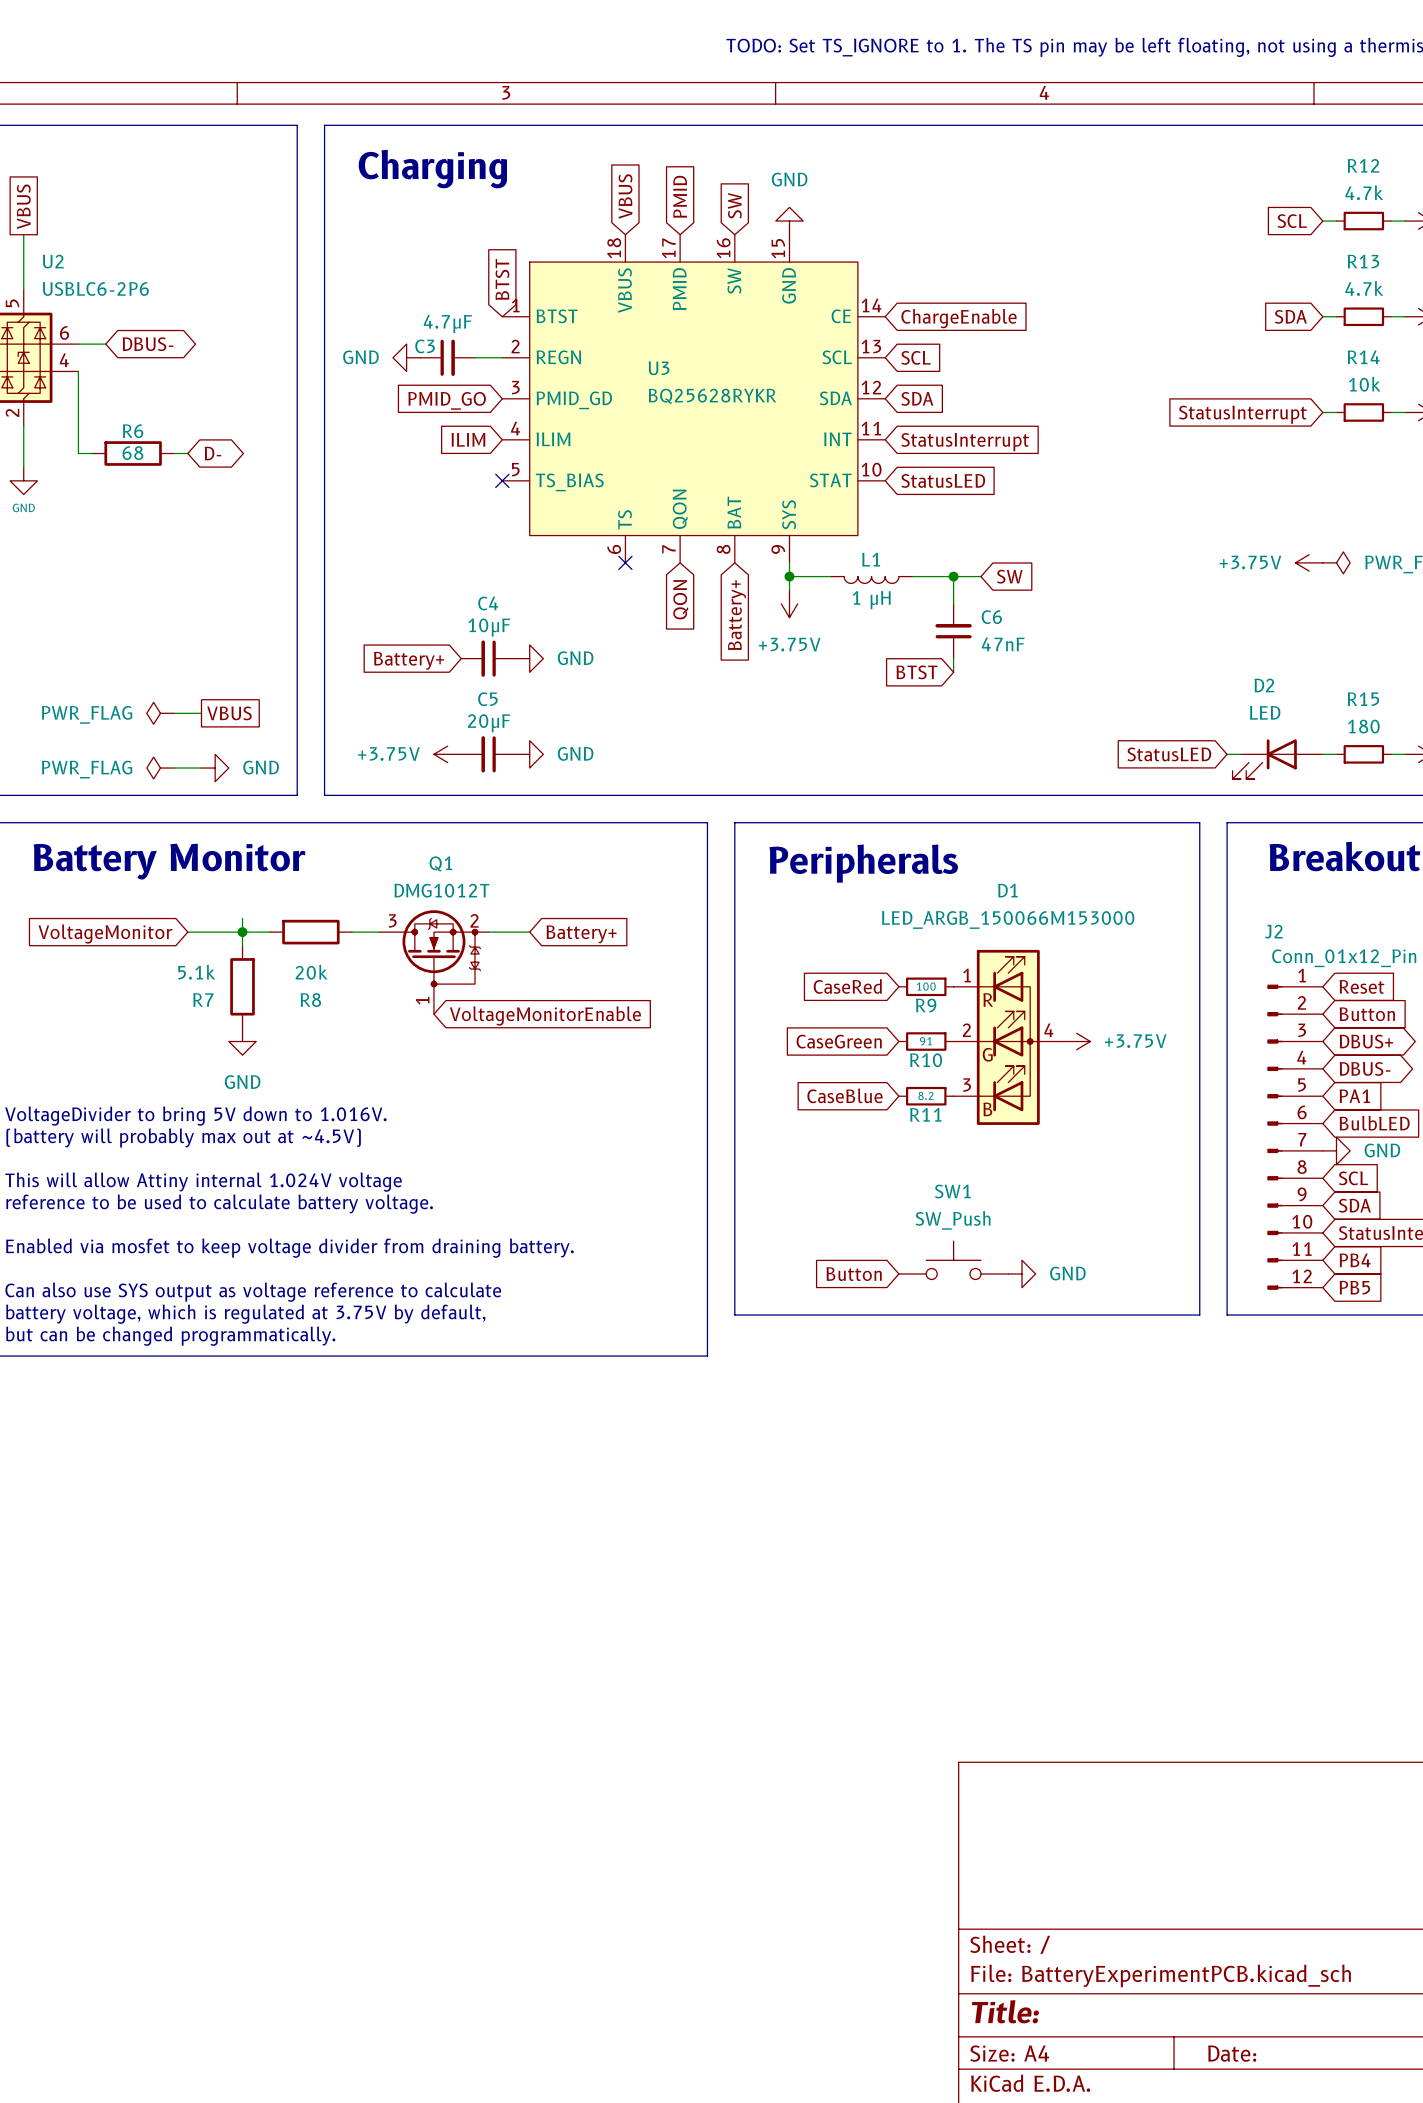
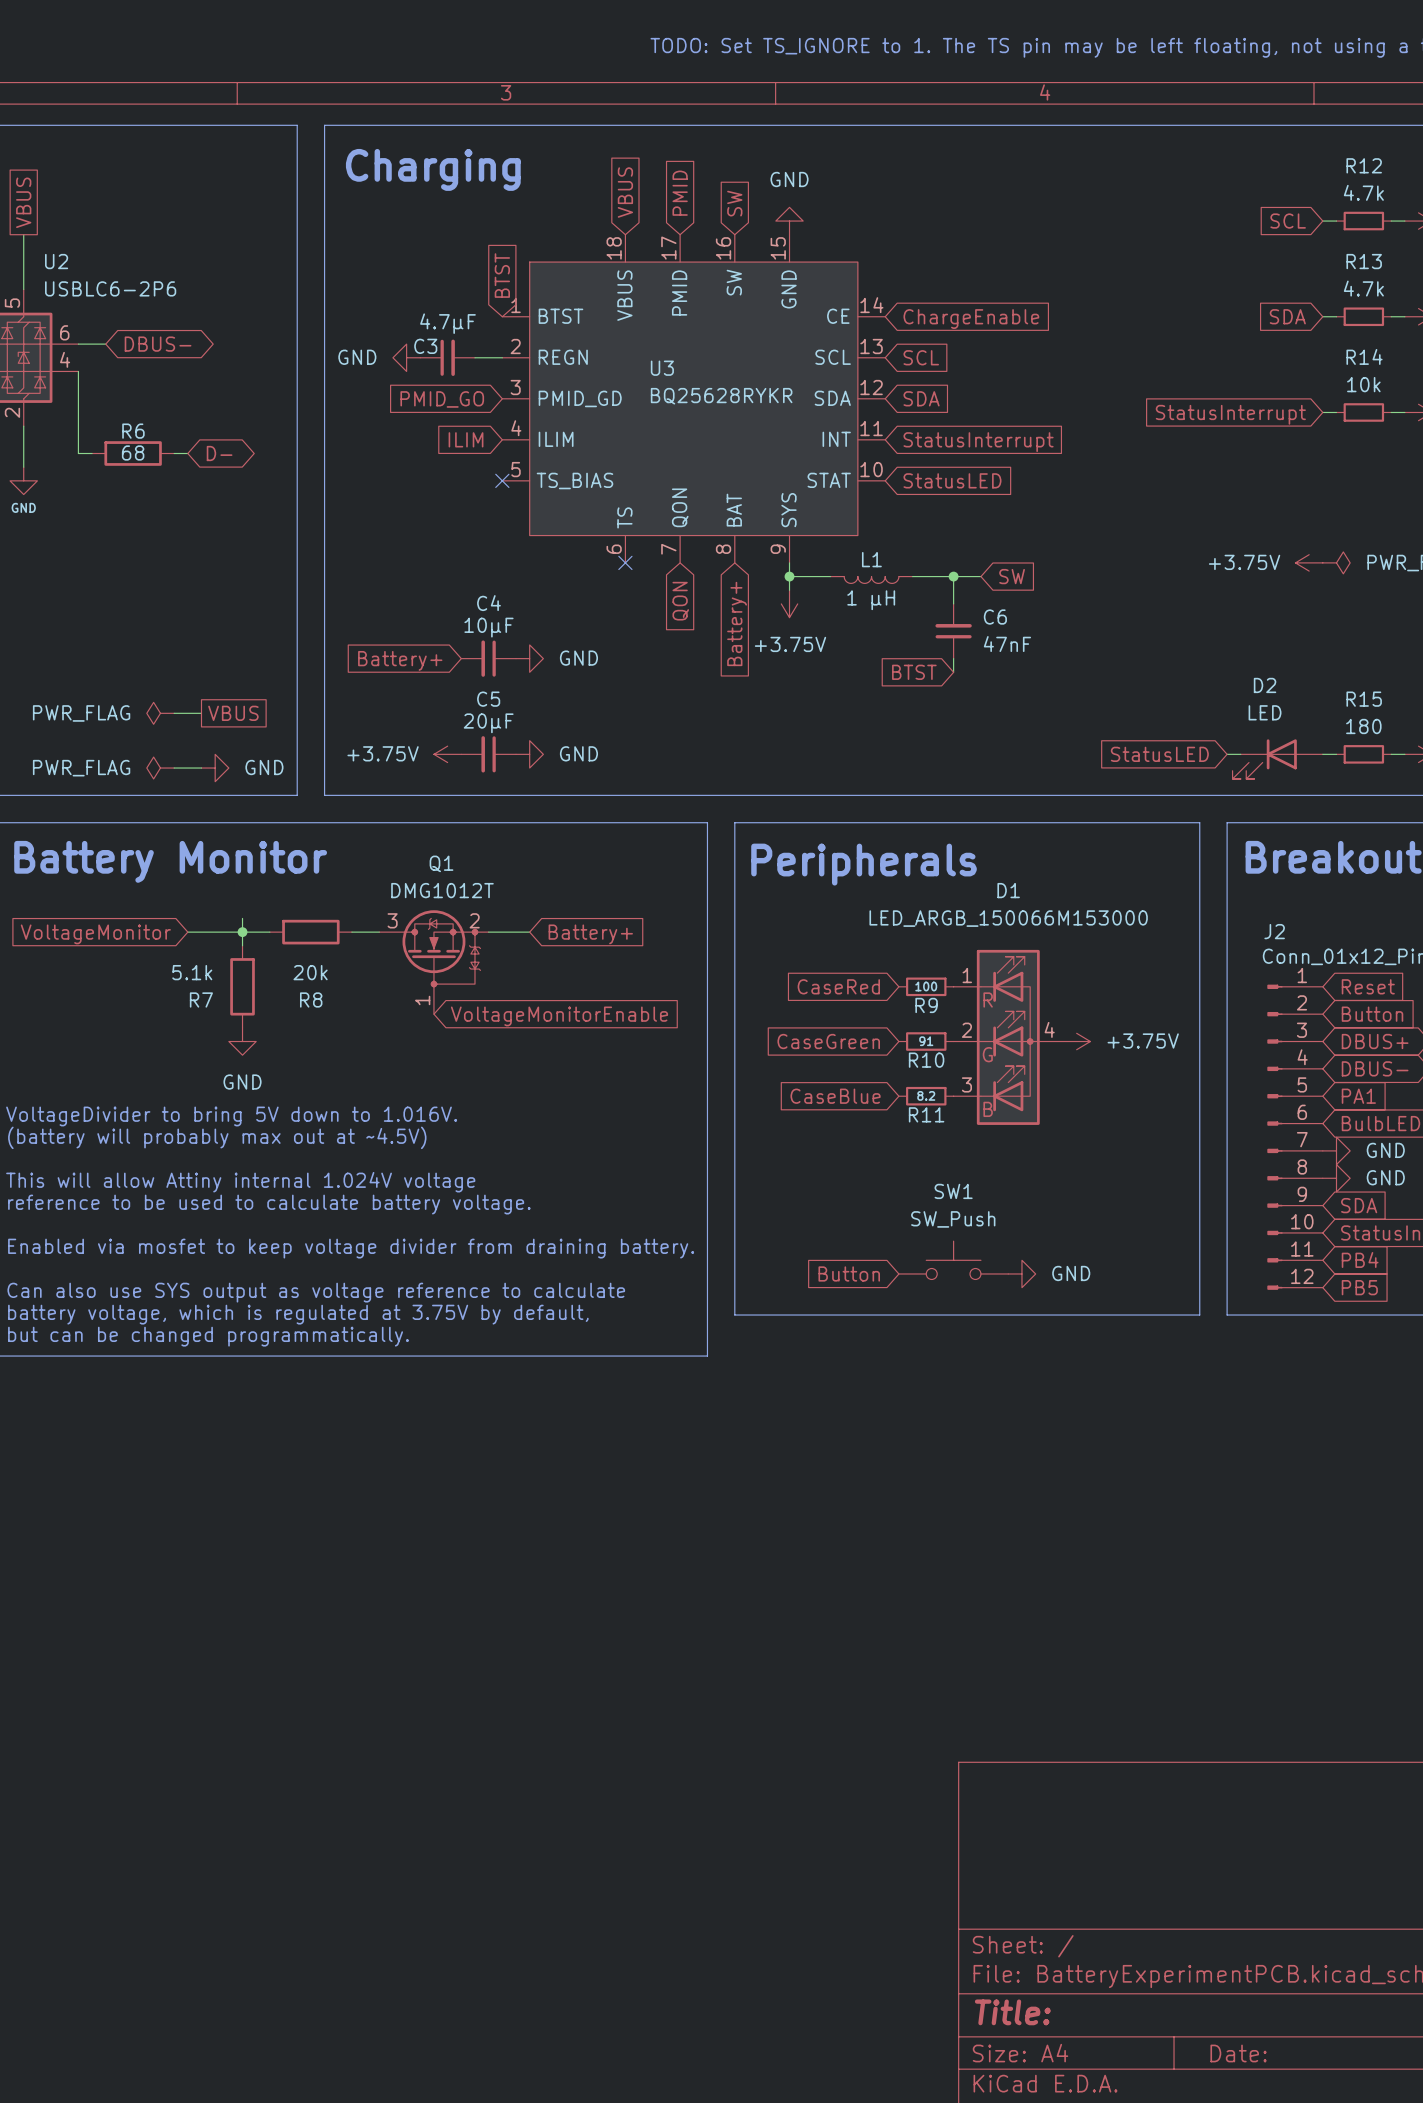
power symbol: none -> GND (1336, 1178)
global label: SCL (1353, 1178) -> none

